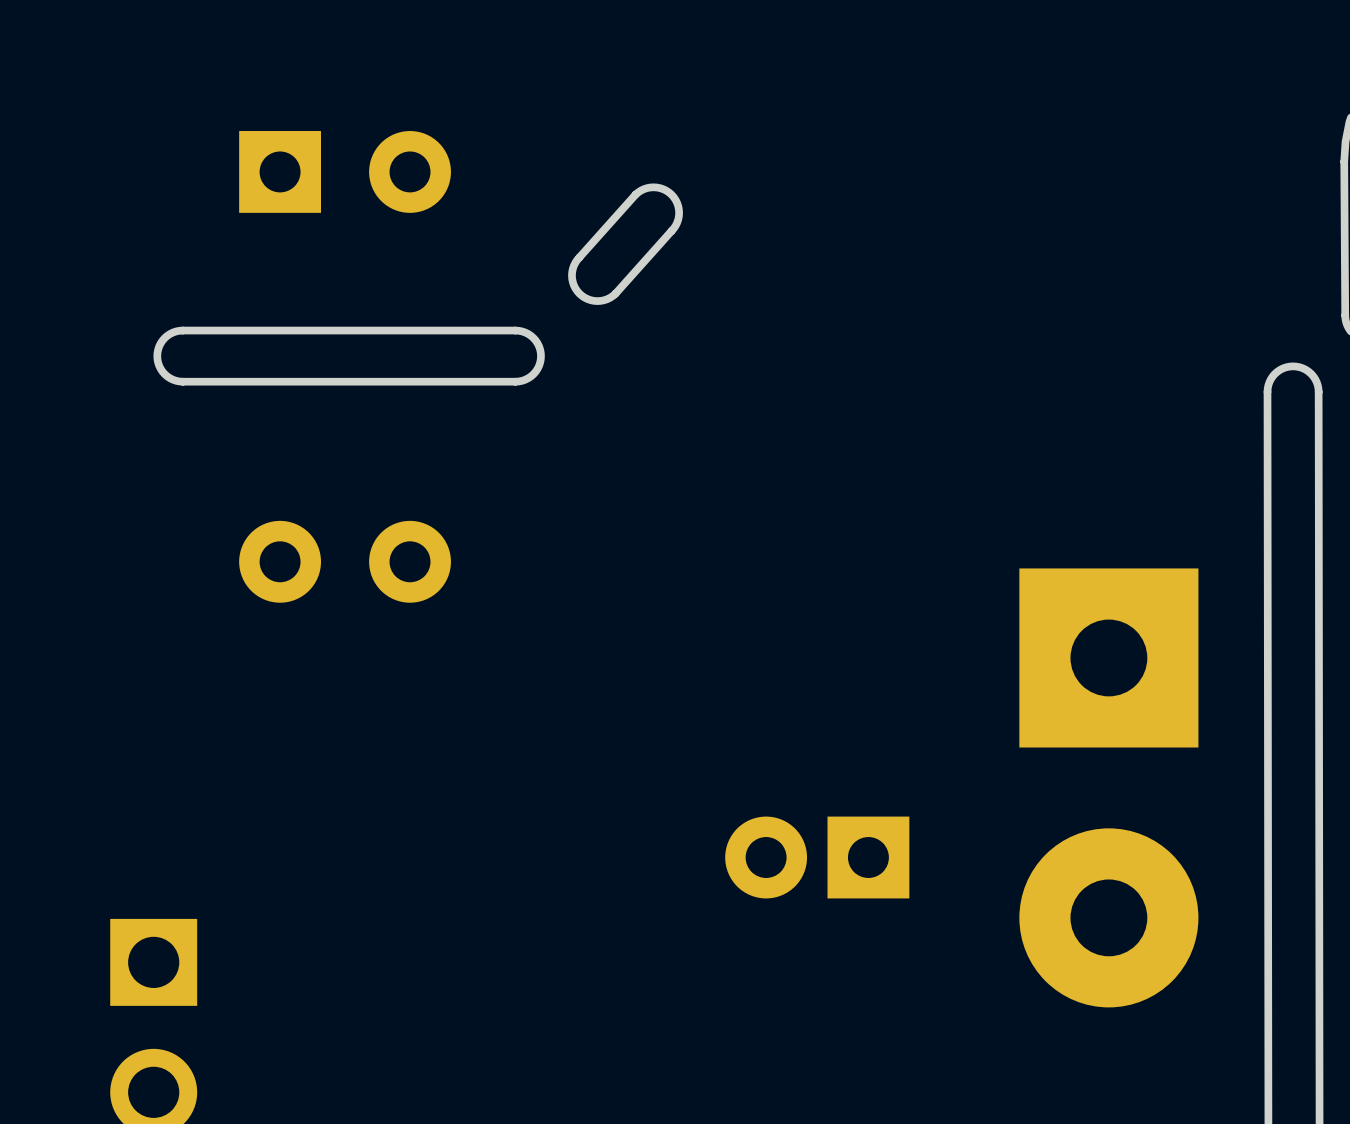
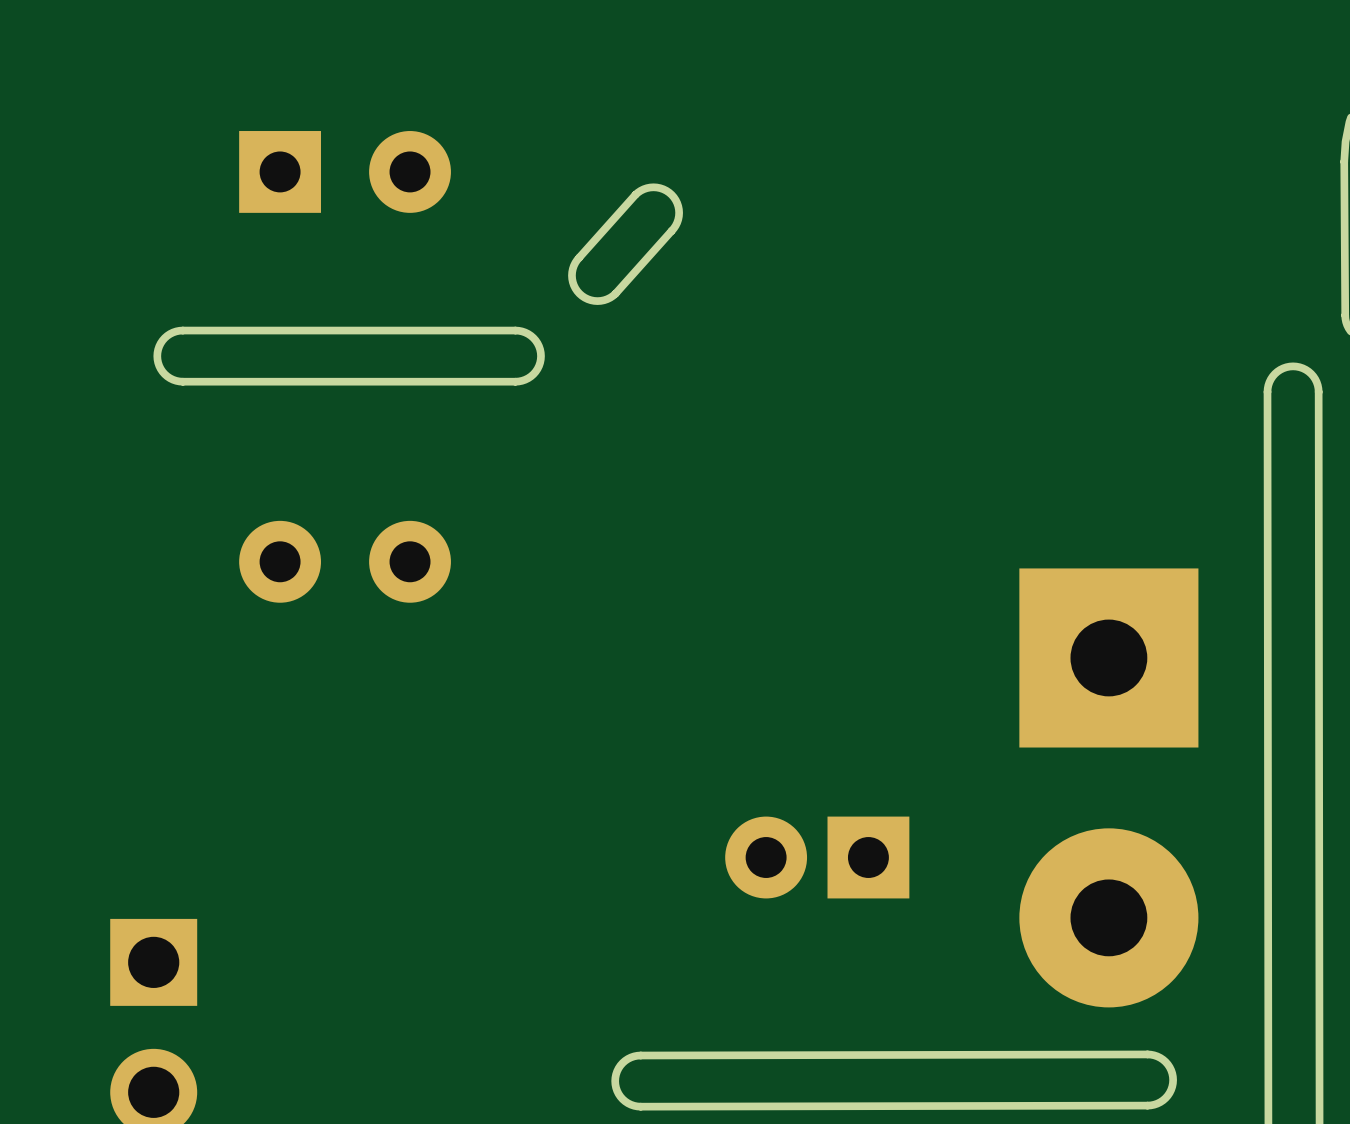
board edge: none -> (1147, 1054) (640, 1055) (630, 1057) (622, 1062) (617, 1071) (615, 1081) (617, 1090) (622, 1099) (630, 1104) (640, 1106) (1147, 1105) (1157, 1103) (1165, 1098) (1171, 1089) (1173, 1080) (1171, 1070) (1165, 1061) (1157, 1056) (1147, 1054)

